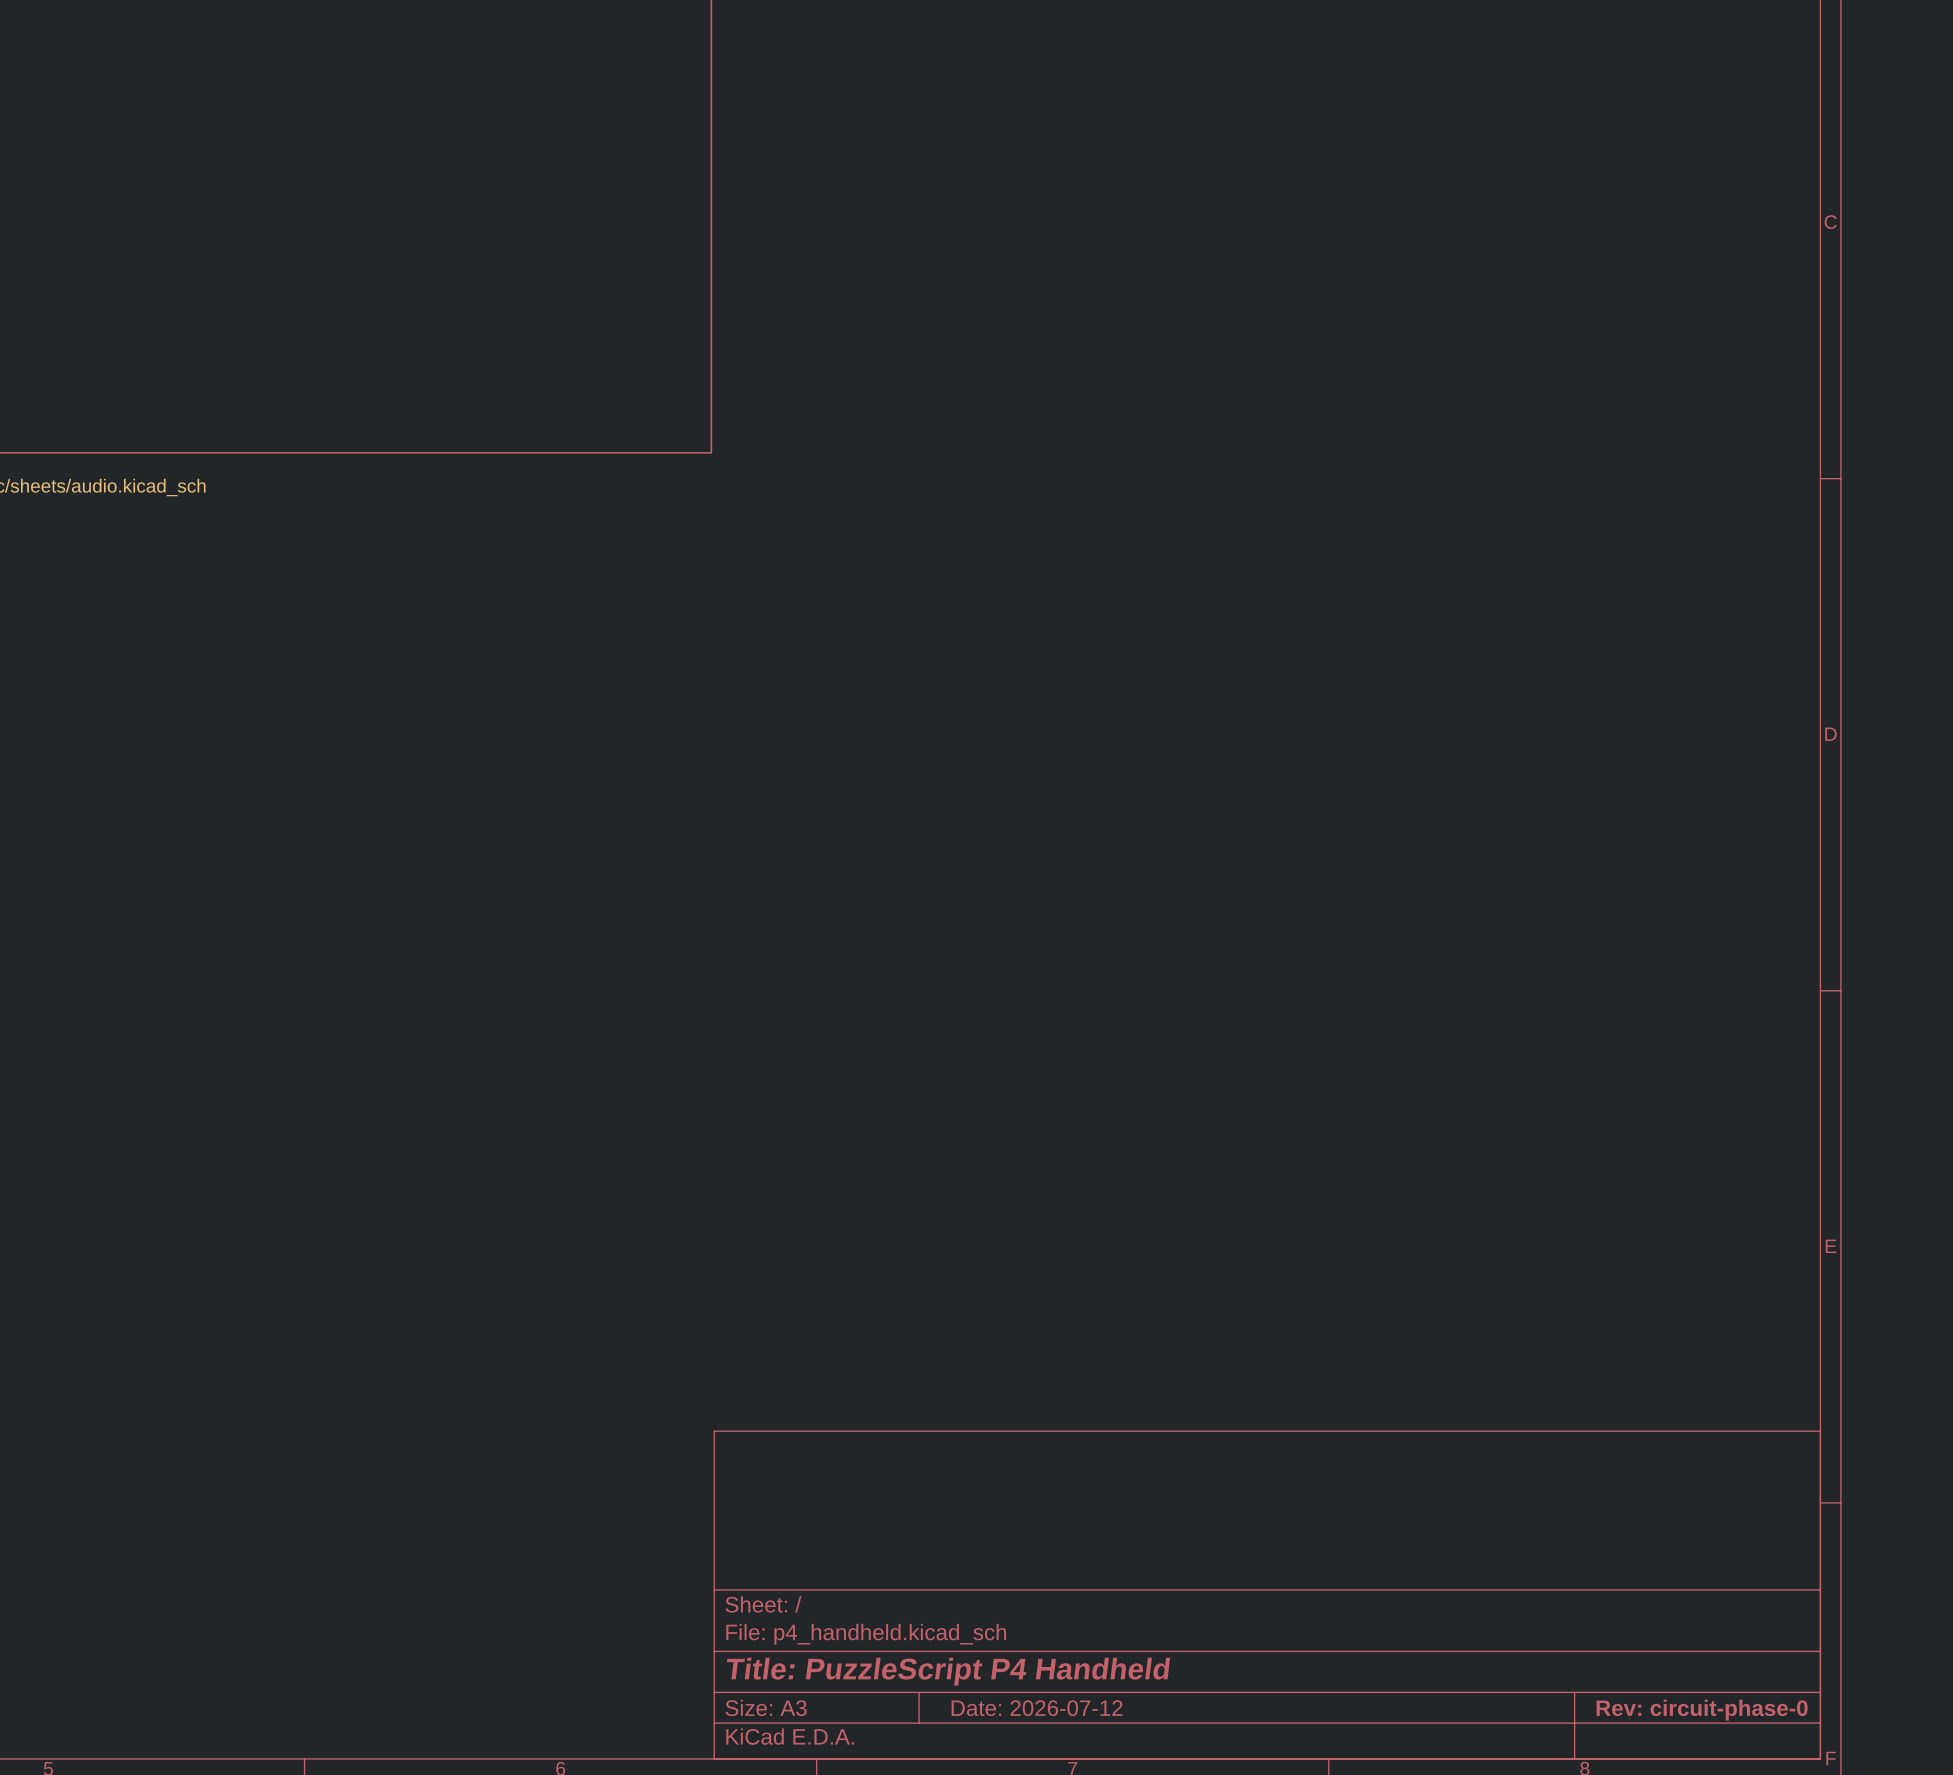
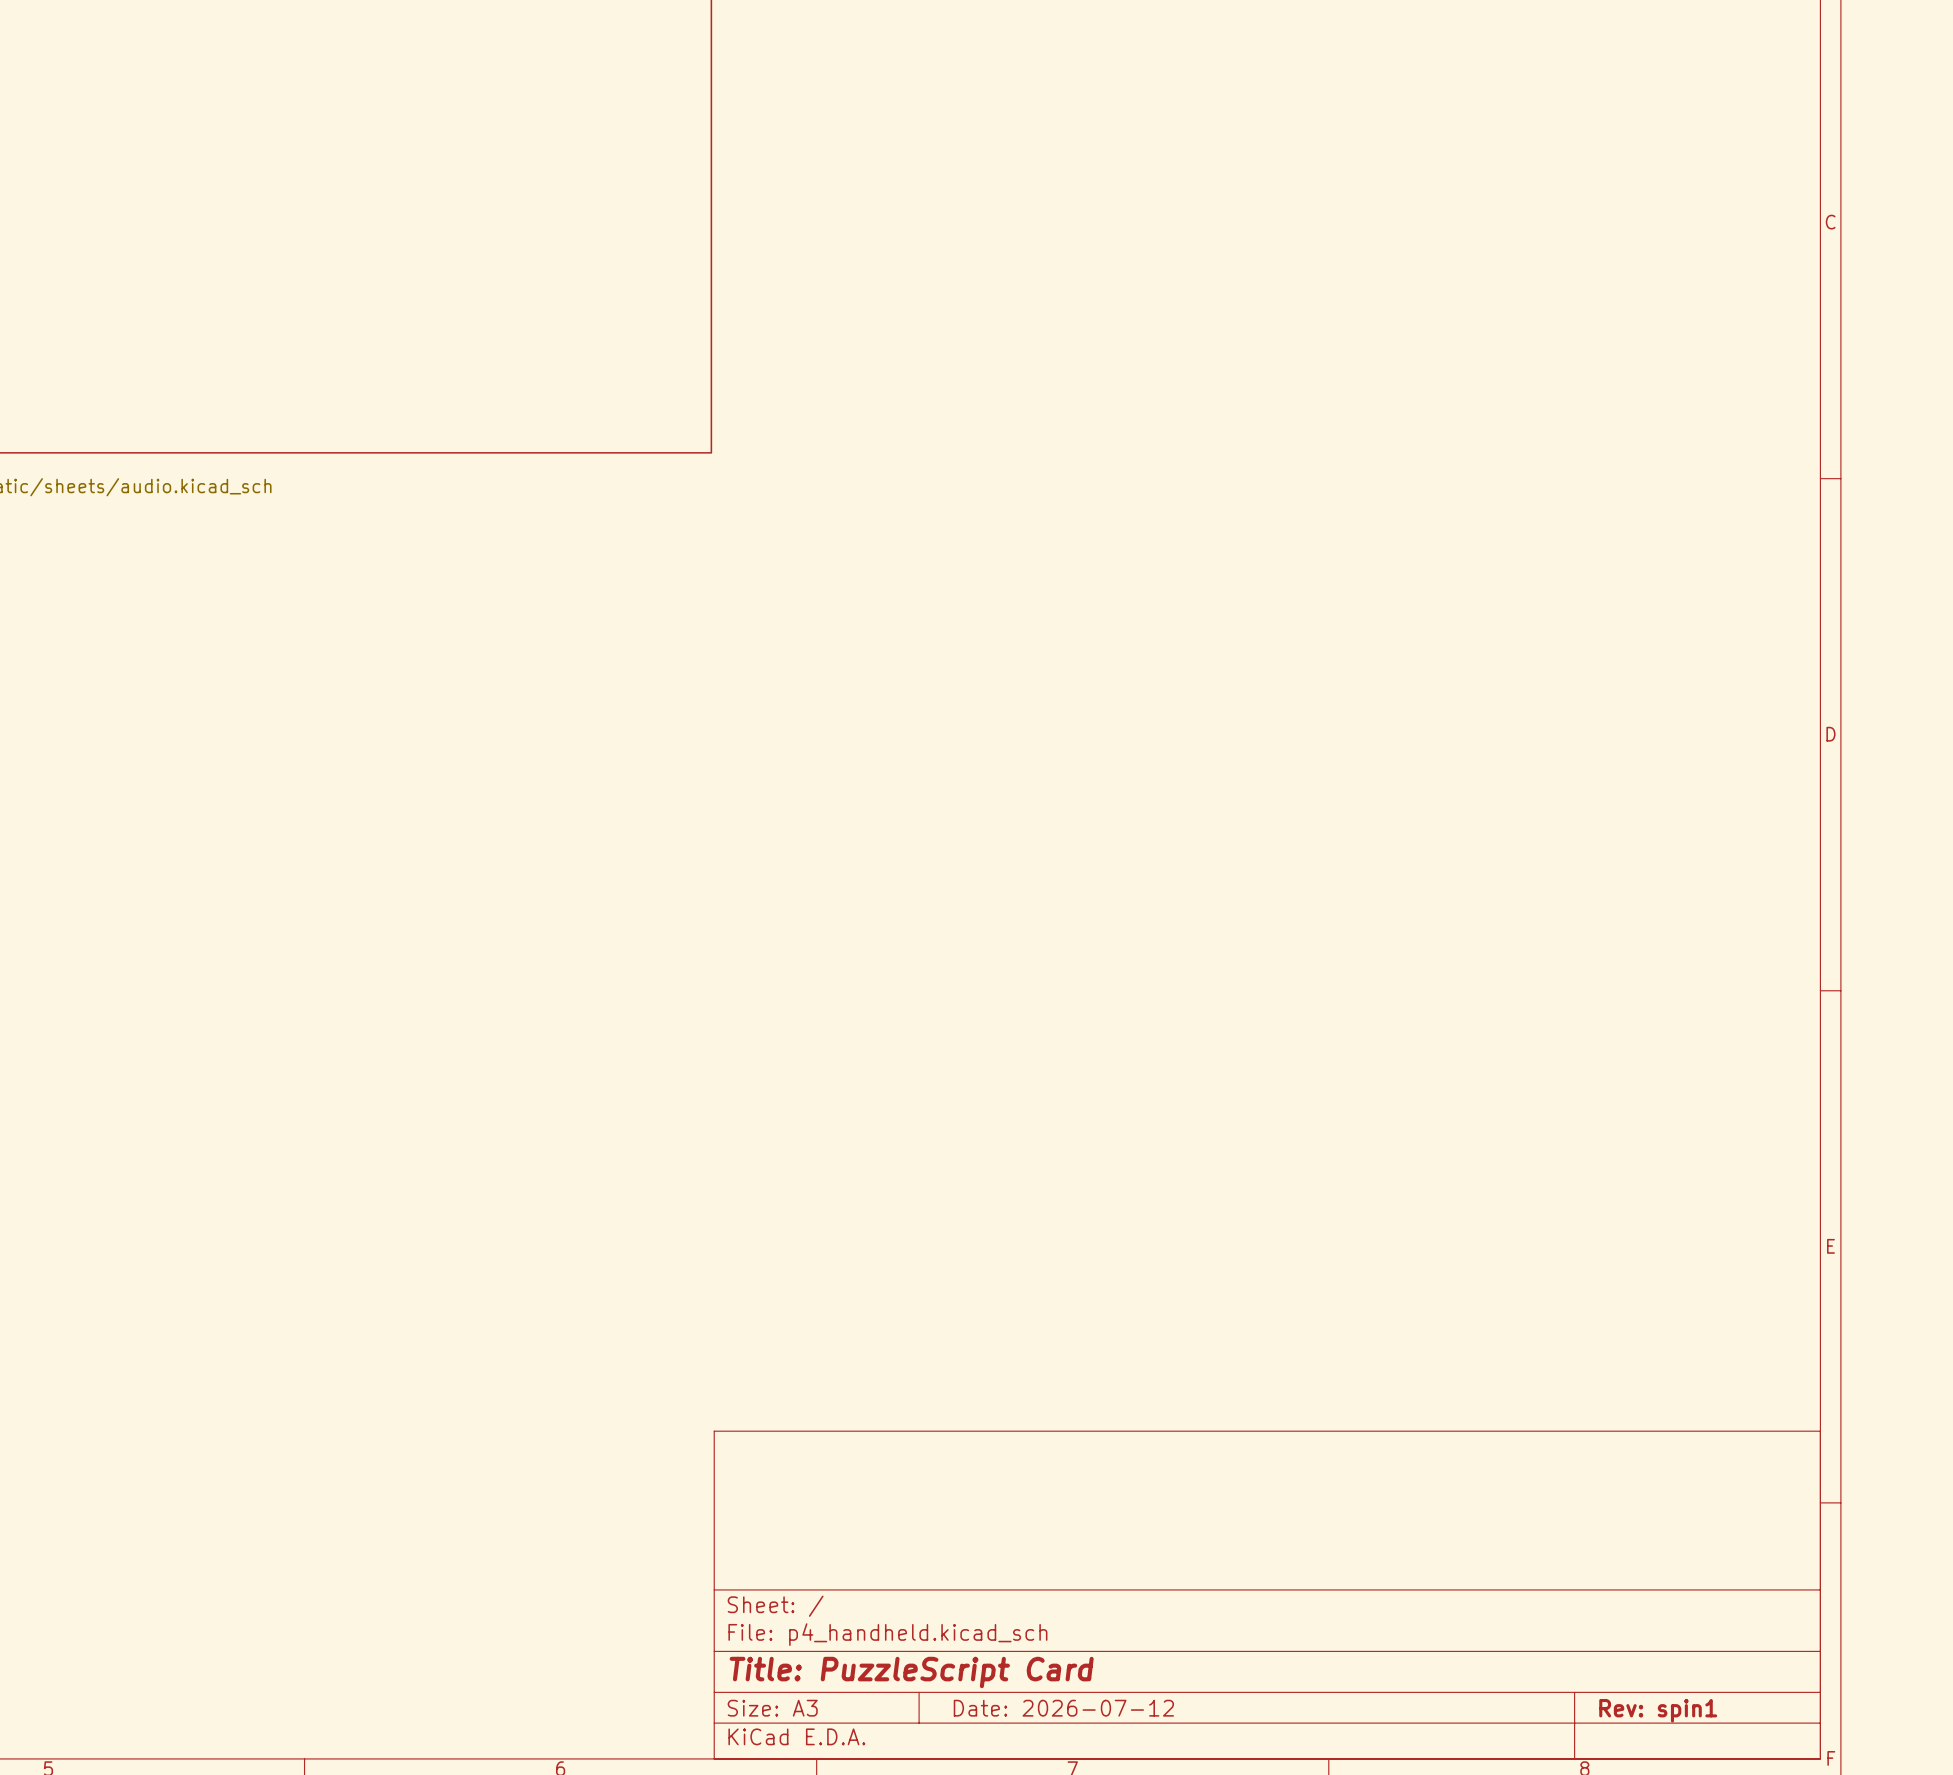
title block: Title: PuzzleScript P4 Handheld (948, 1671) -> Title: PuzzleScript Card (911, 1672)
title block: Rev: circuit-phase-0 (1702, 1710) -> Rev: spin1 (1658, 1710)

